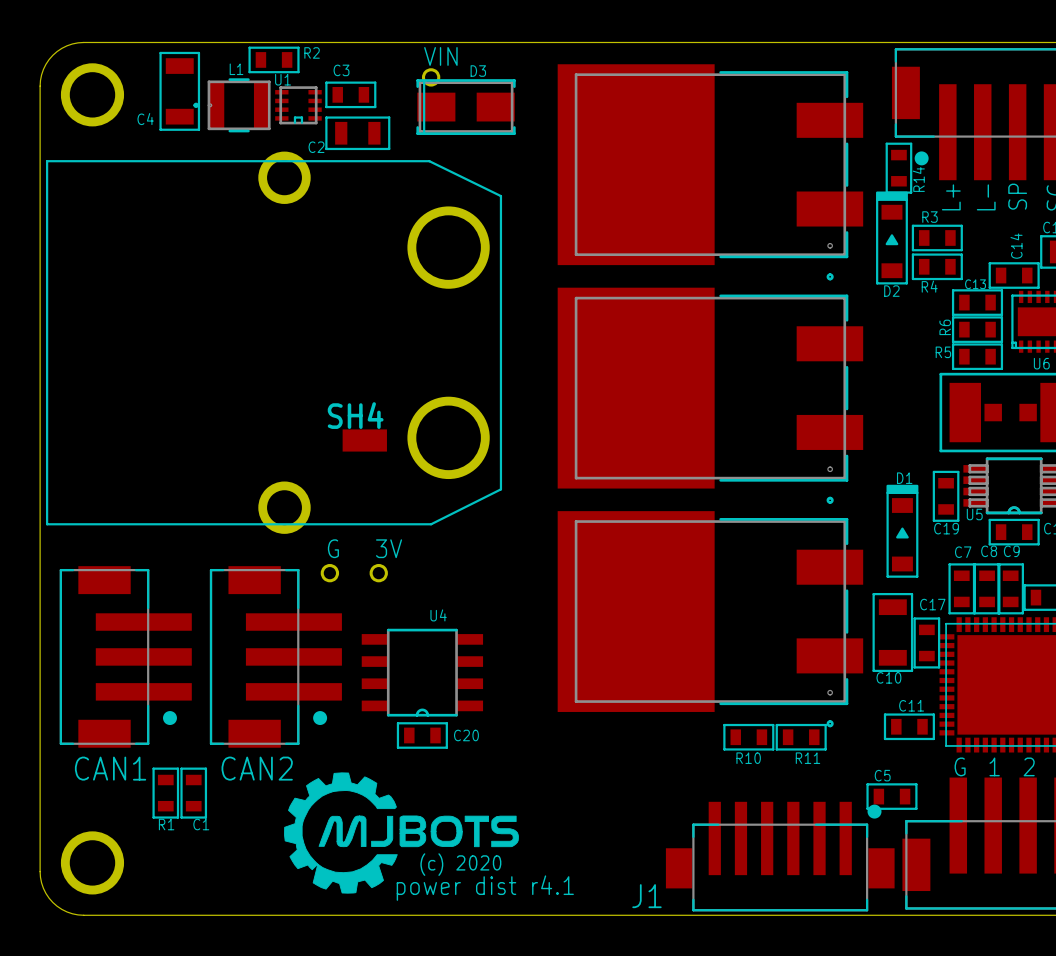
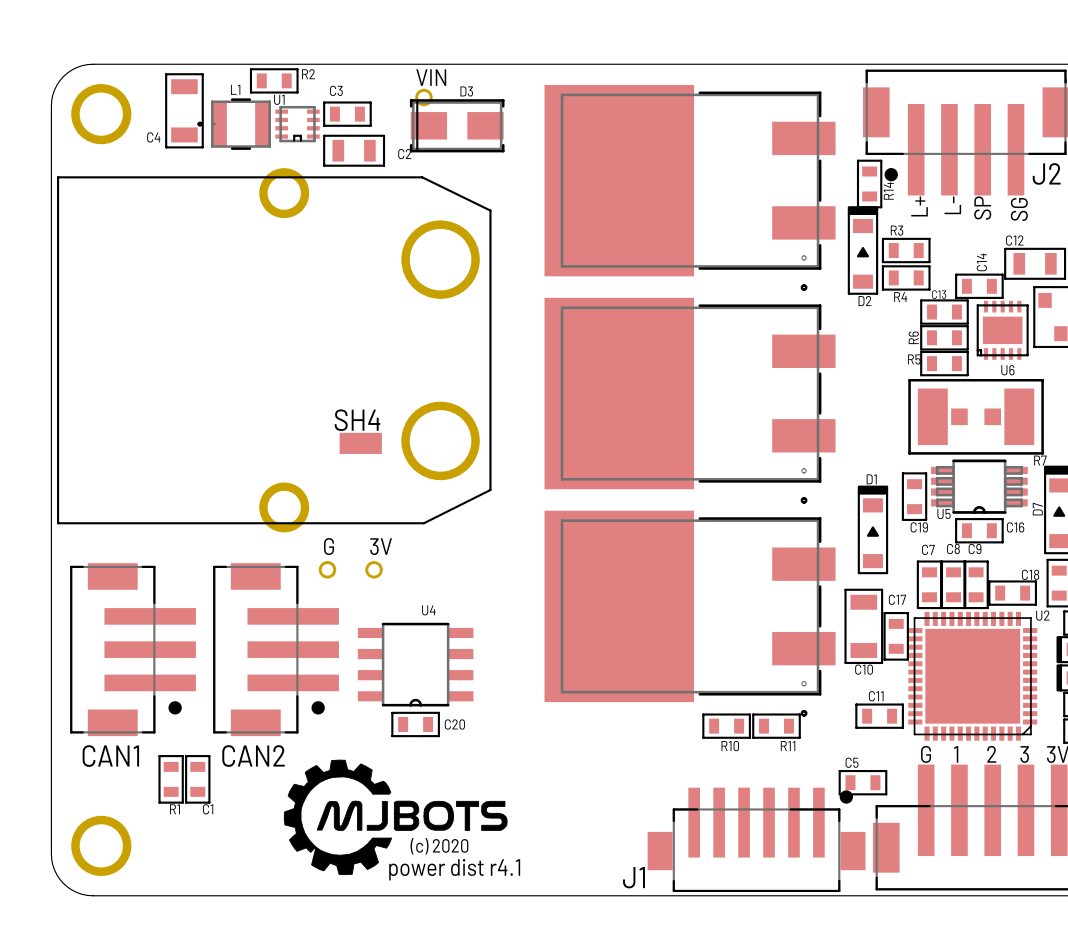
C2 name position: C2 (316, 147) -> C2 (404, 154)

